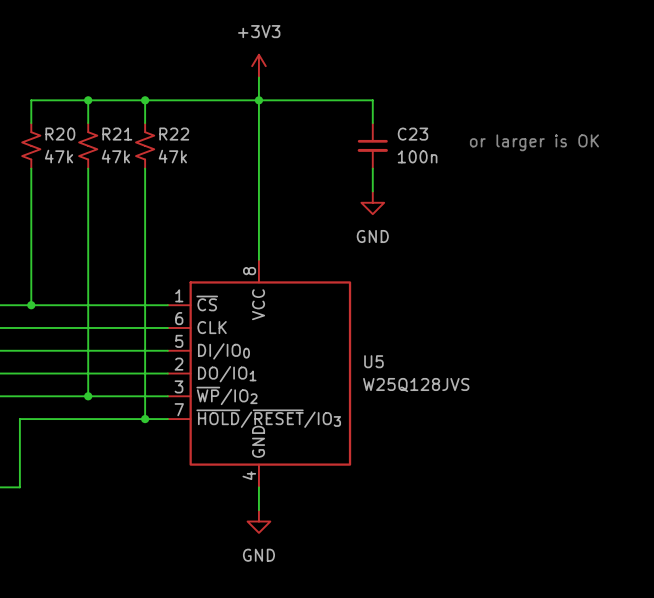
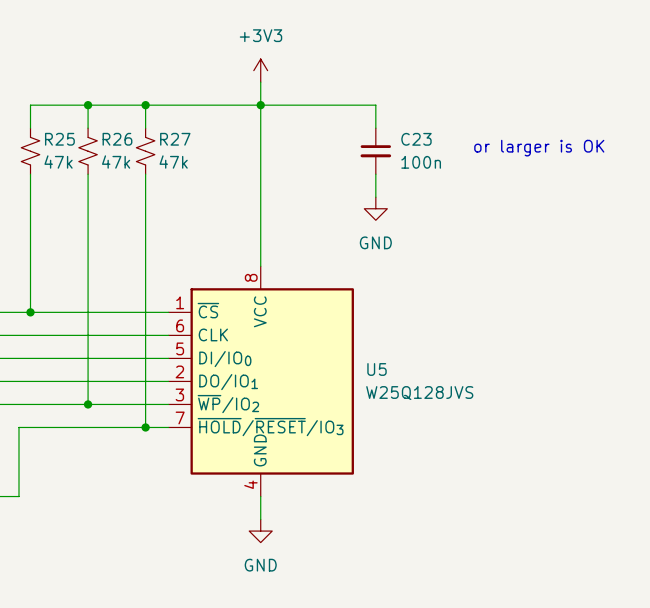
R20 name: R20 (60, 134) -> R25 (59, 139)
R21 name: R21 (117, 134) -> R26 (117, 139)
R22 name: R22 (174, 134) -> R27 (175, 139)

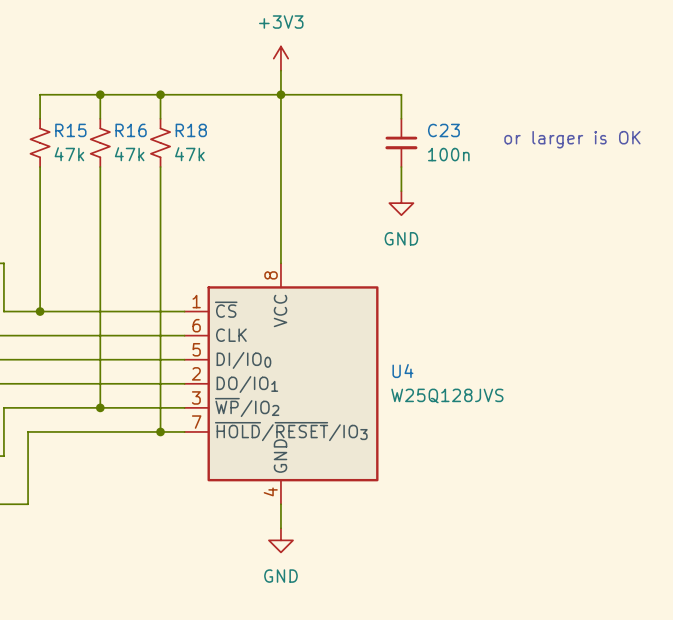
R25 name: R25 (59, 139) -> R15 (70, 130)
R26 name: R26 (117, 139) -> R16 (131, 130)
R27 name: R27 (175, 139) -> R18 (191, 130)
U5 name: U5 (377, 369) -> U4 (402, 371)

